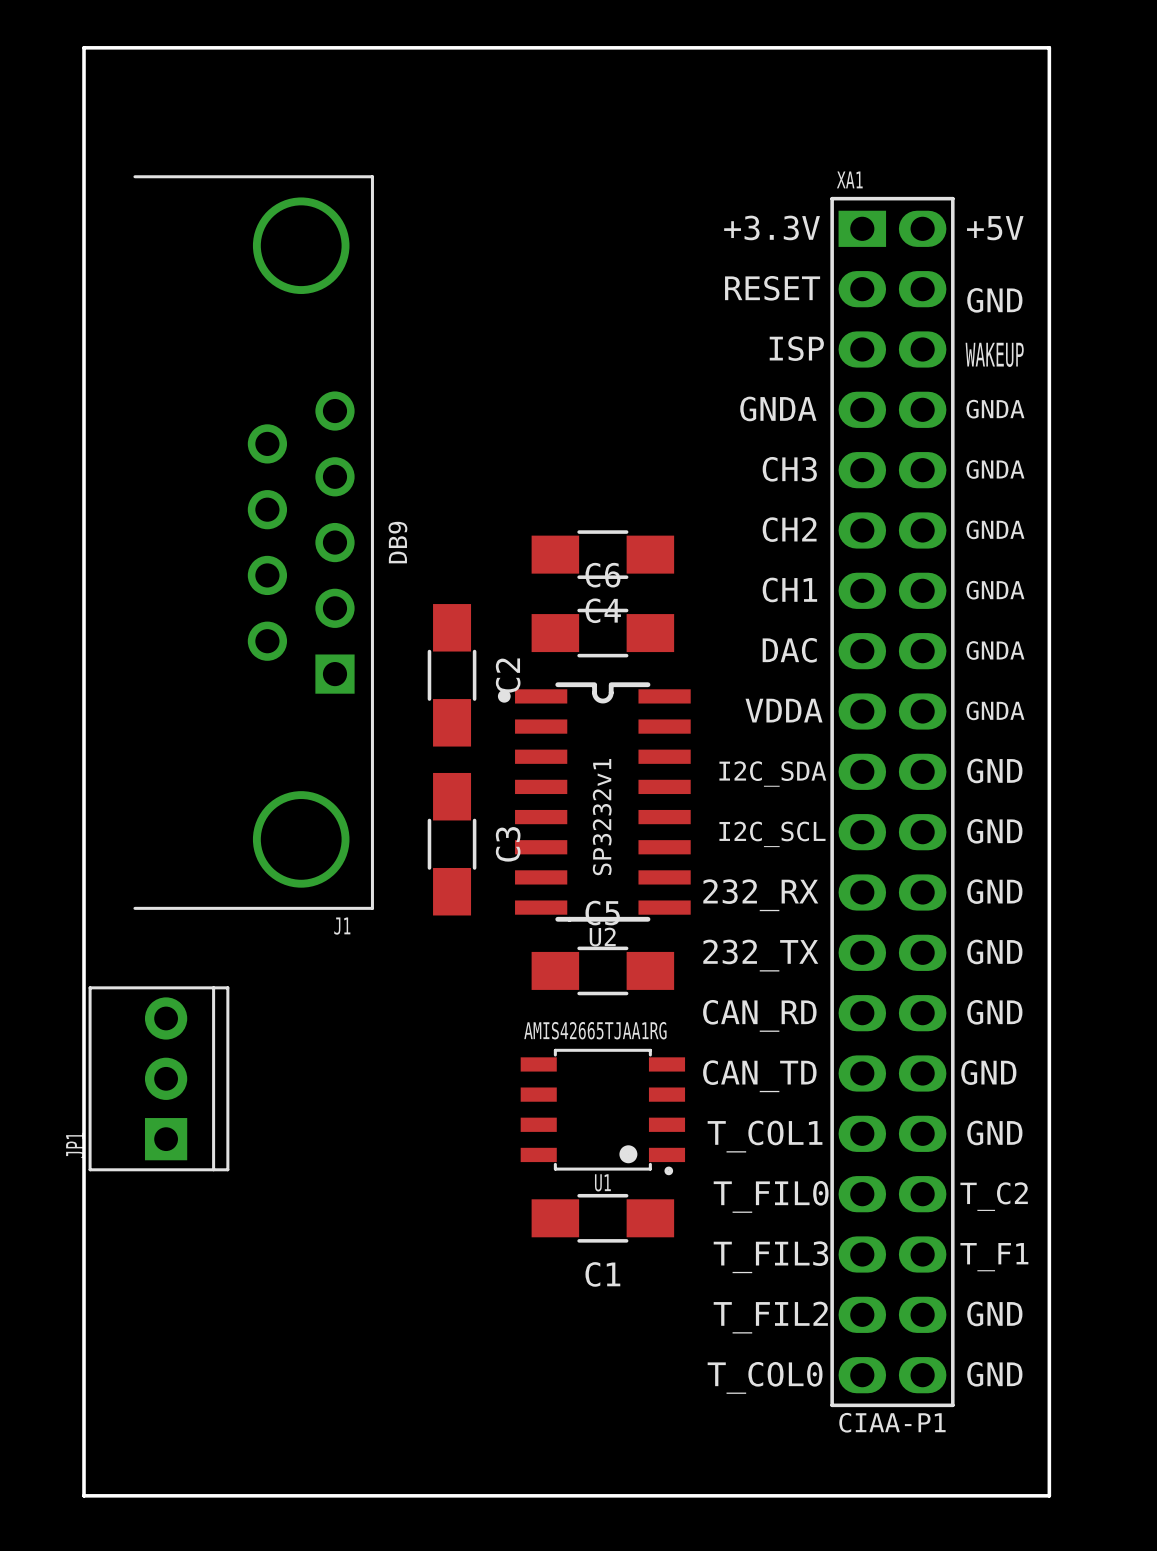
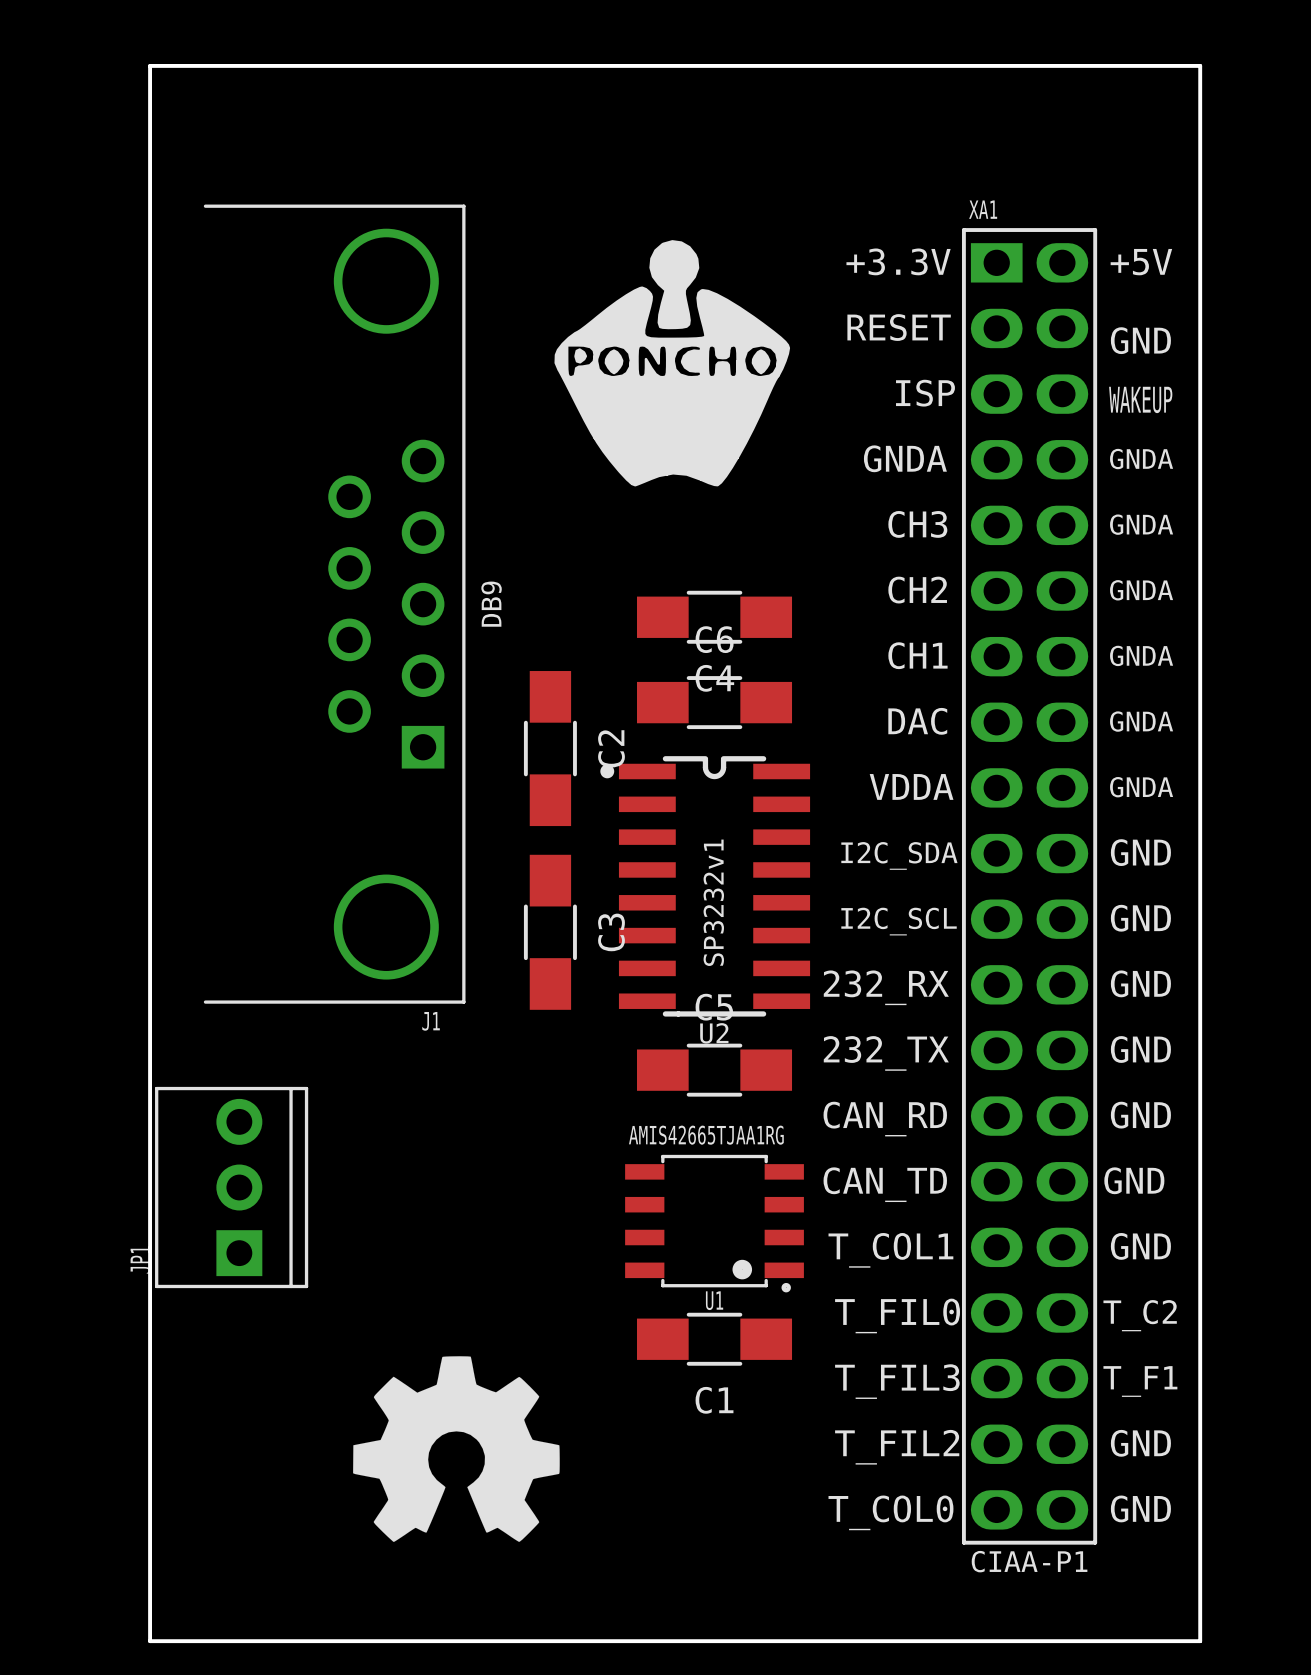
drawing: none -> [554, 240, 791, 487]
drawing: none -> [353, 1356, 560, 1542]

